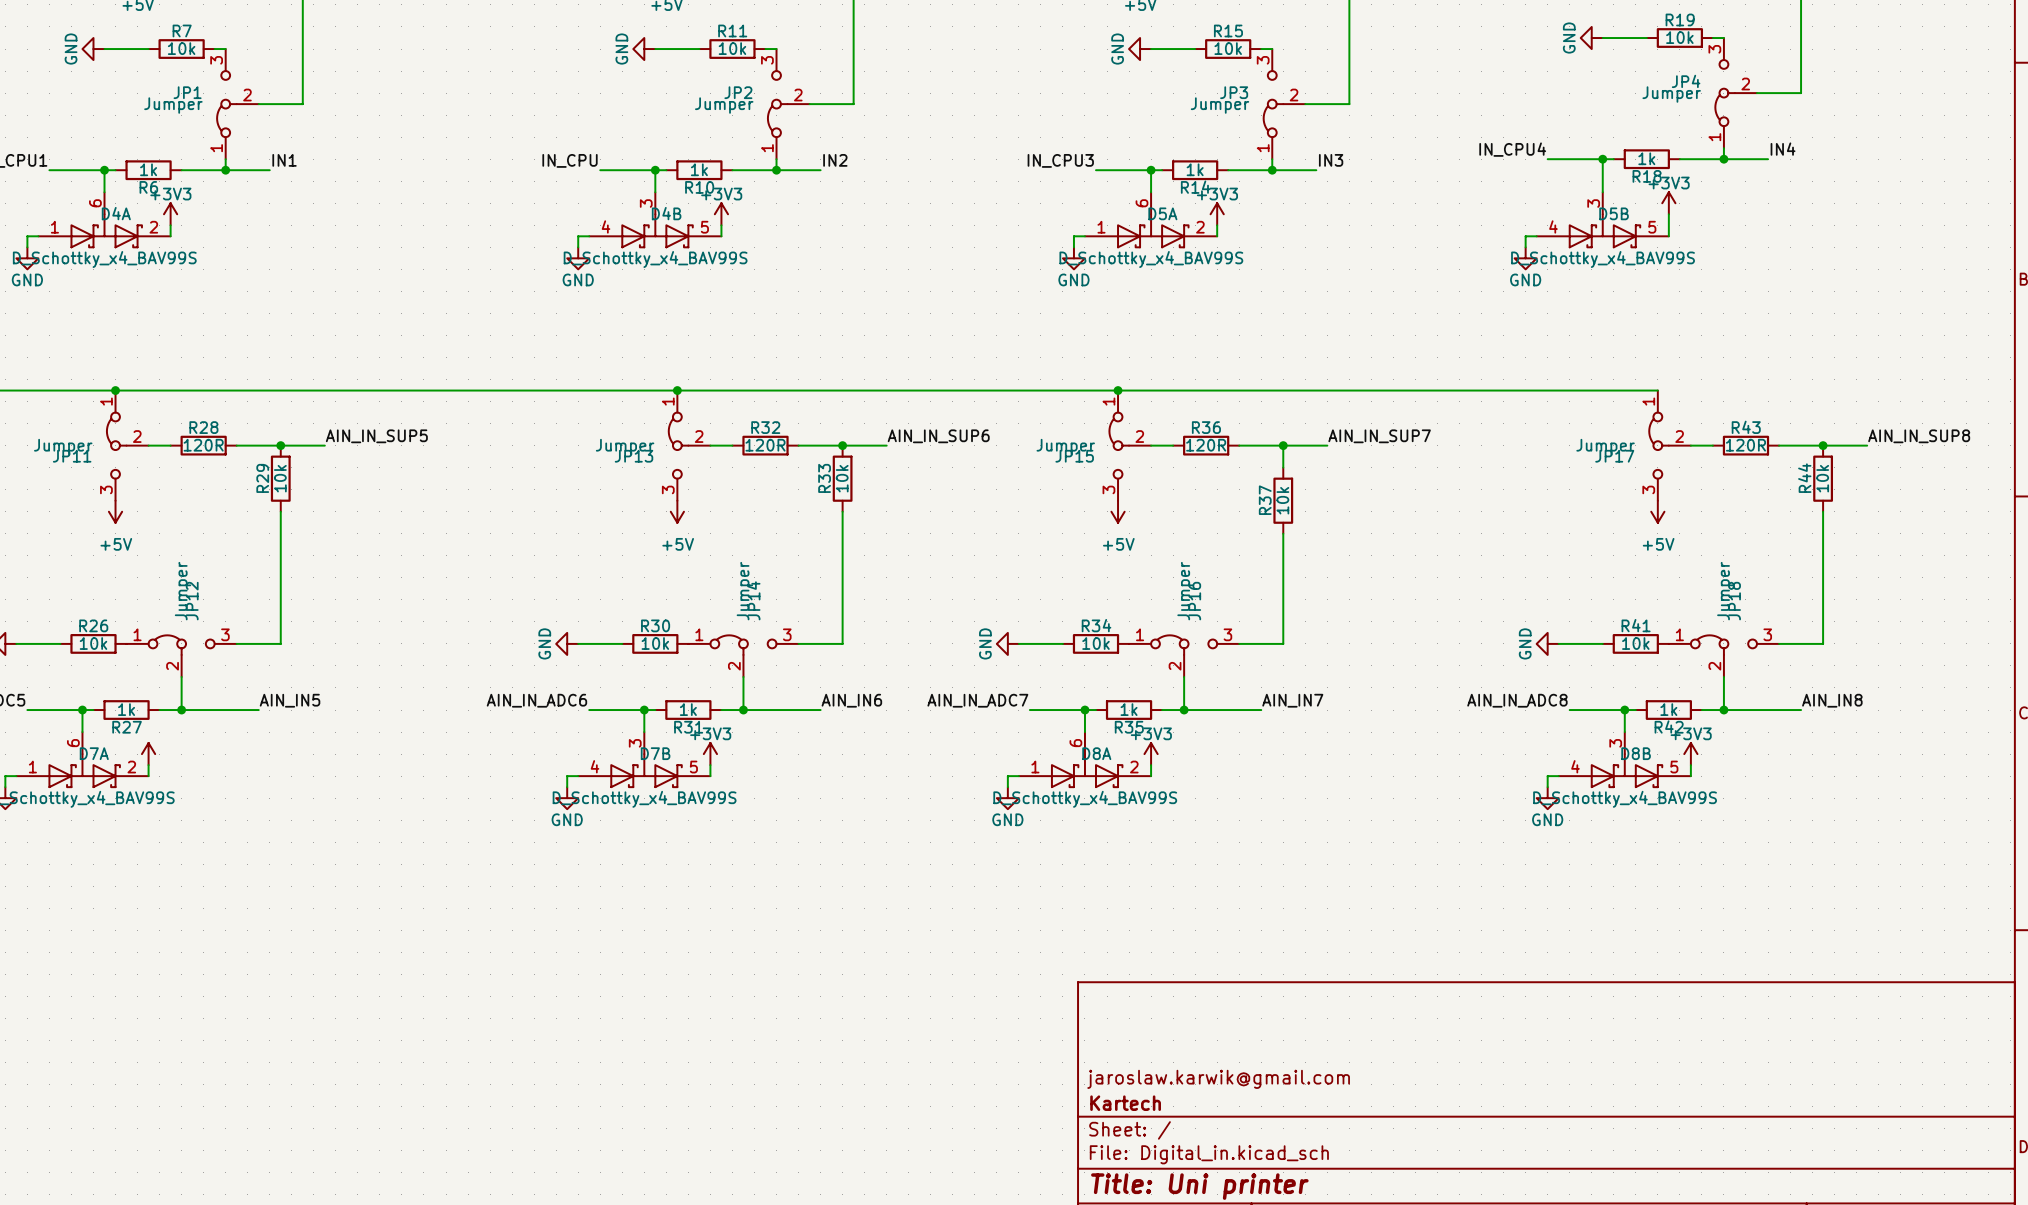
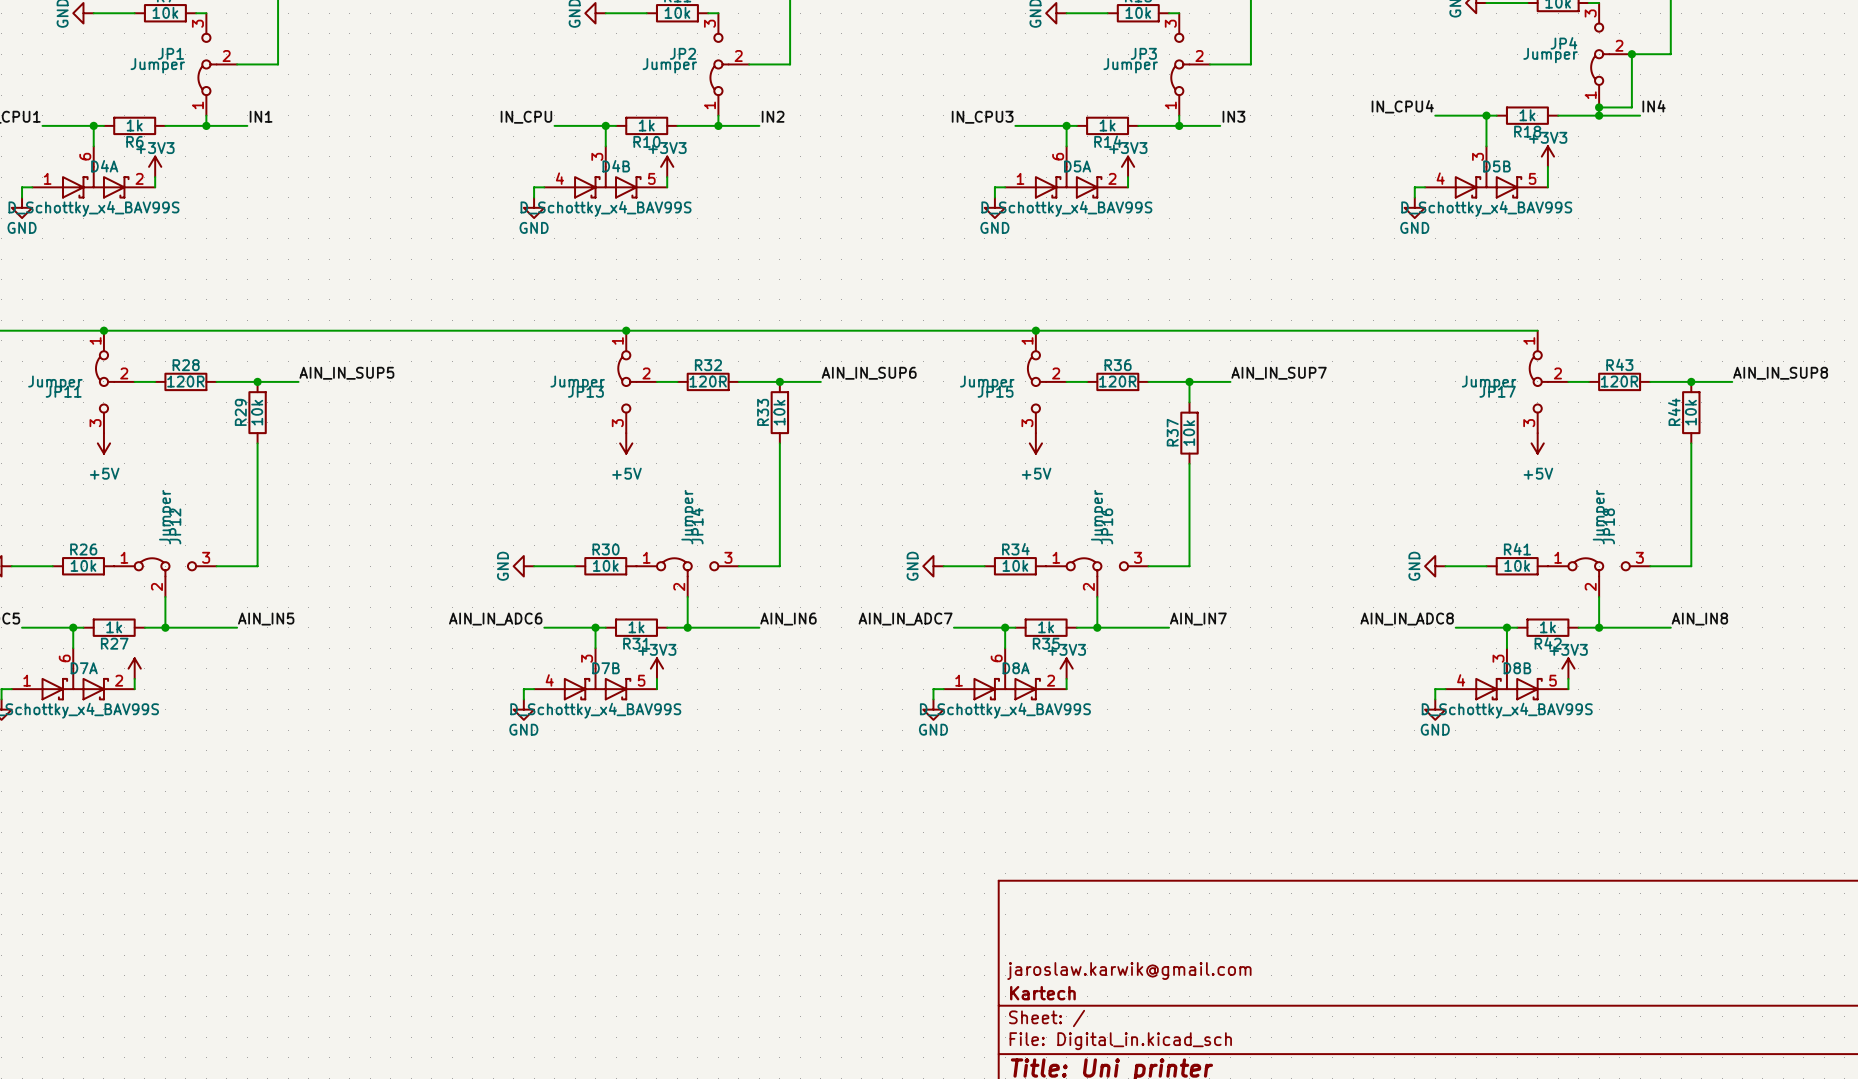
wire: none -> (1631, 54) (1631, 107) (1599, 107)
junction: none -> (1631, 54)
junction: none -> (1599, 107)

